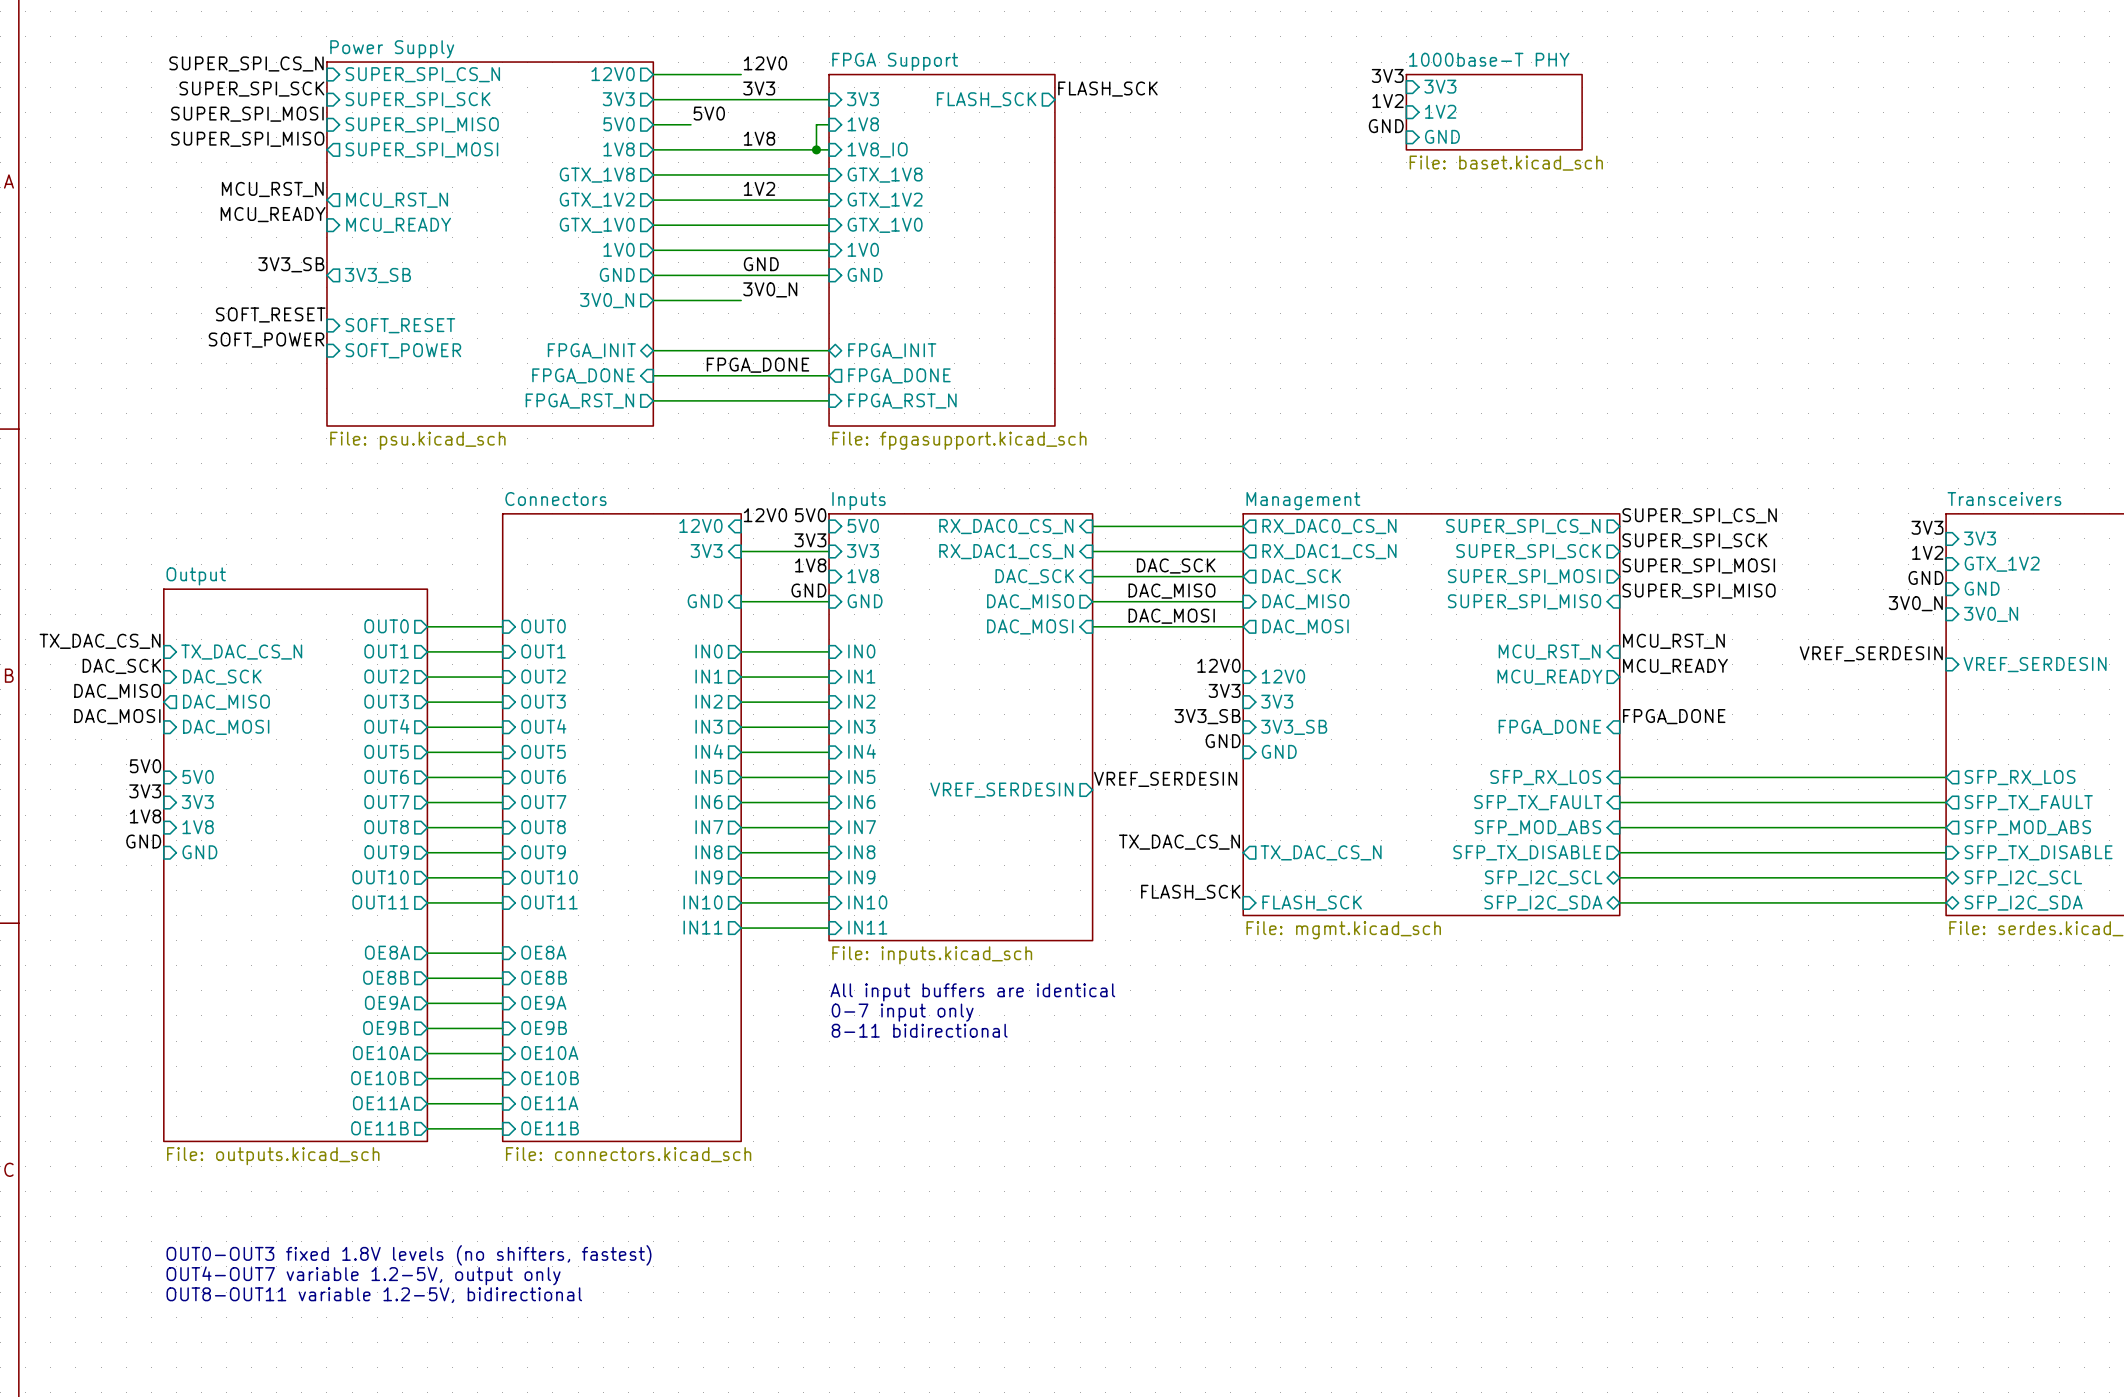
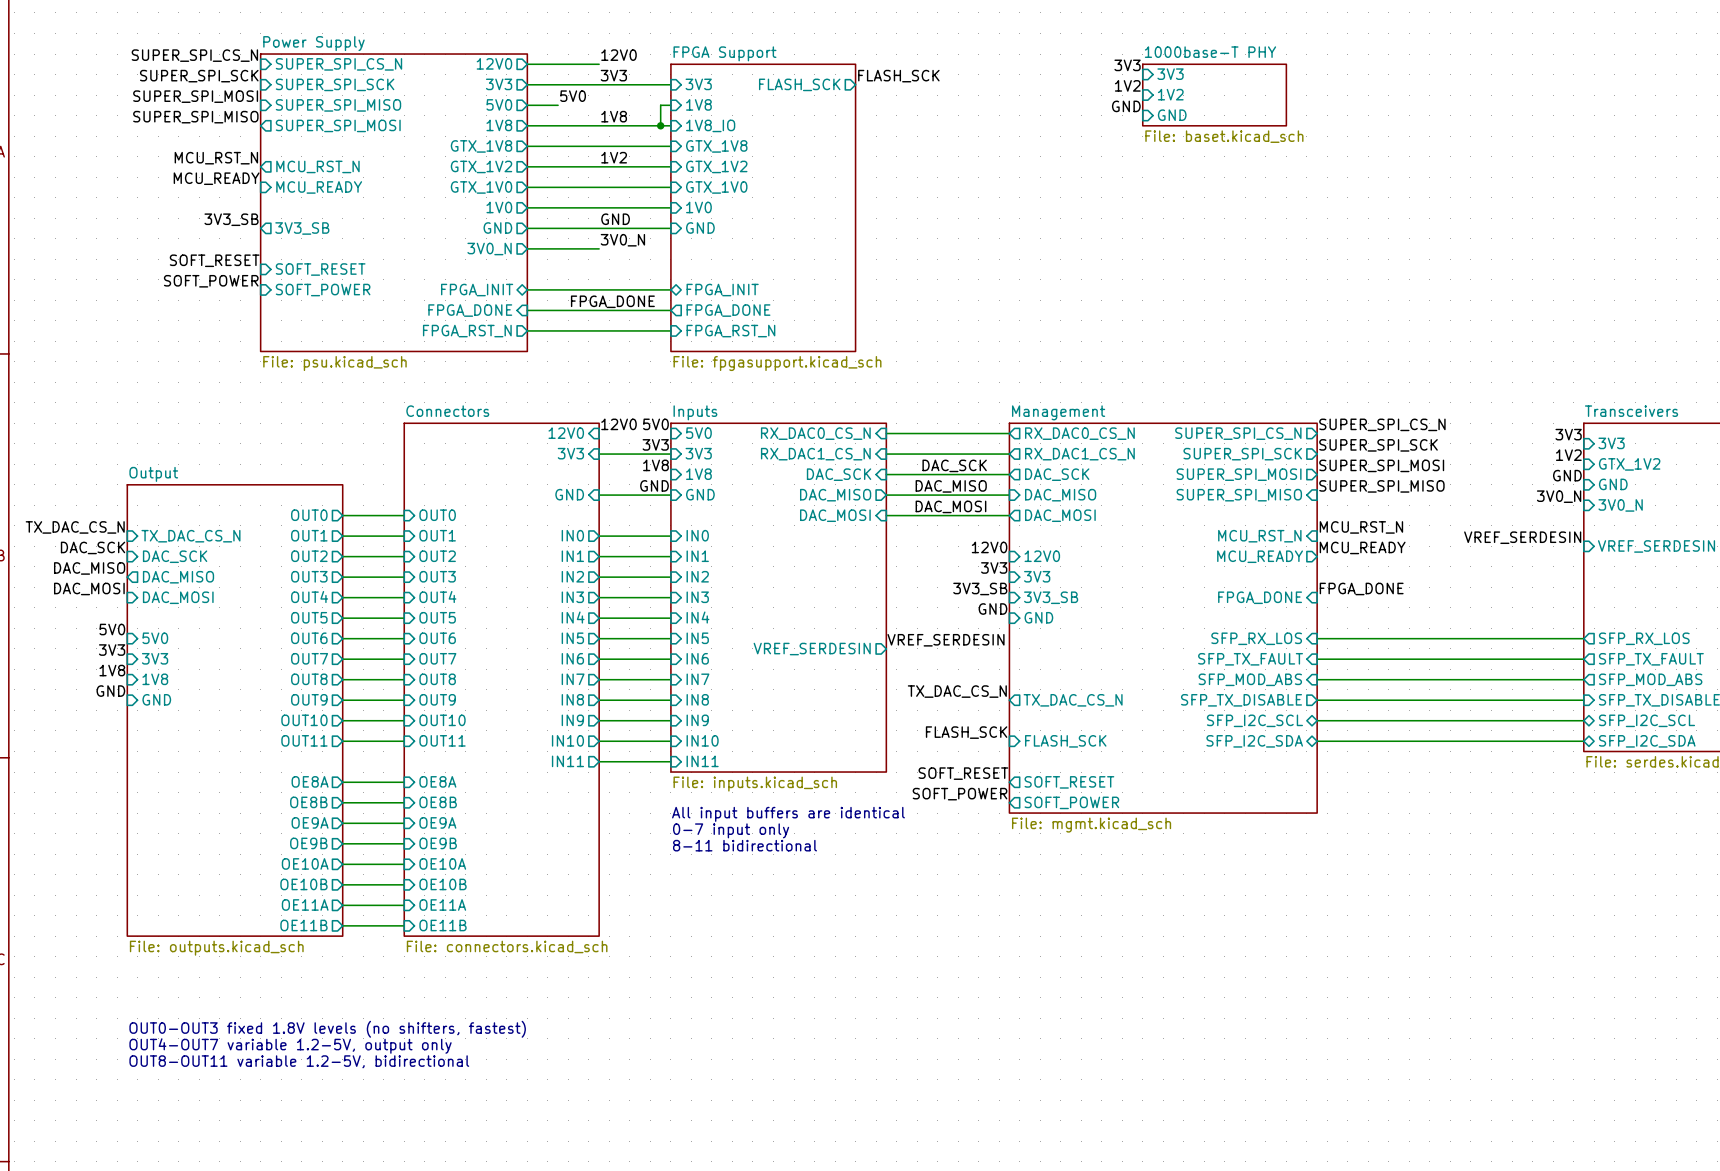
sheet Management: File: mgmt.kicad_sch (1431, 714) -> none
sheet Management: none -> File: mgmt.kicad_sch (1163, 618)
label: none -> SOFT_RESET (963, 773)
sheet pin: none -> SOFT_RESET (1069, 782)
label: none -> SOFT_POWER (960, 794)
sheet pin: none -> SOFT_POWER (1071, 802)

